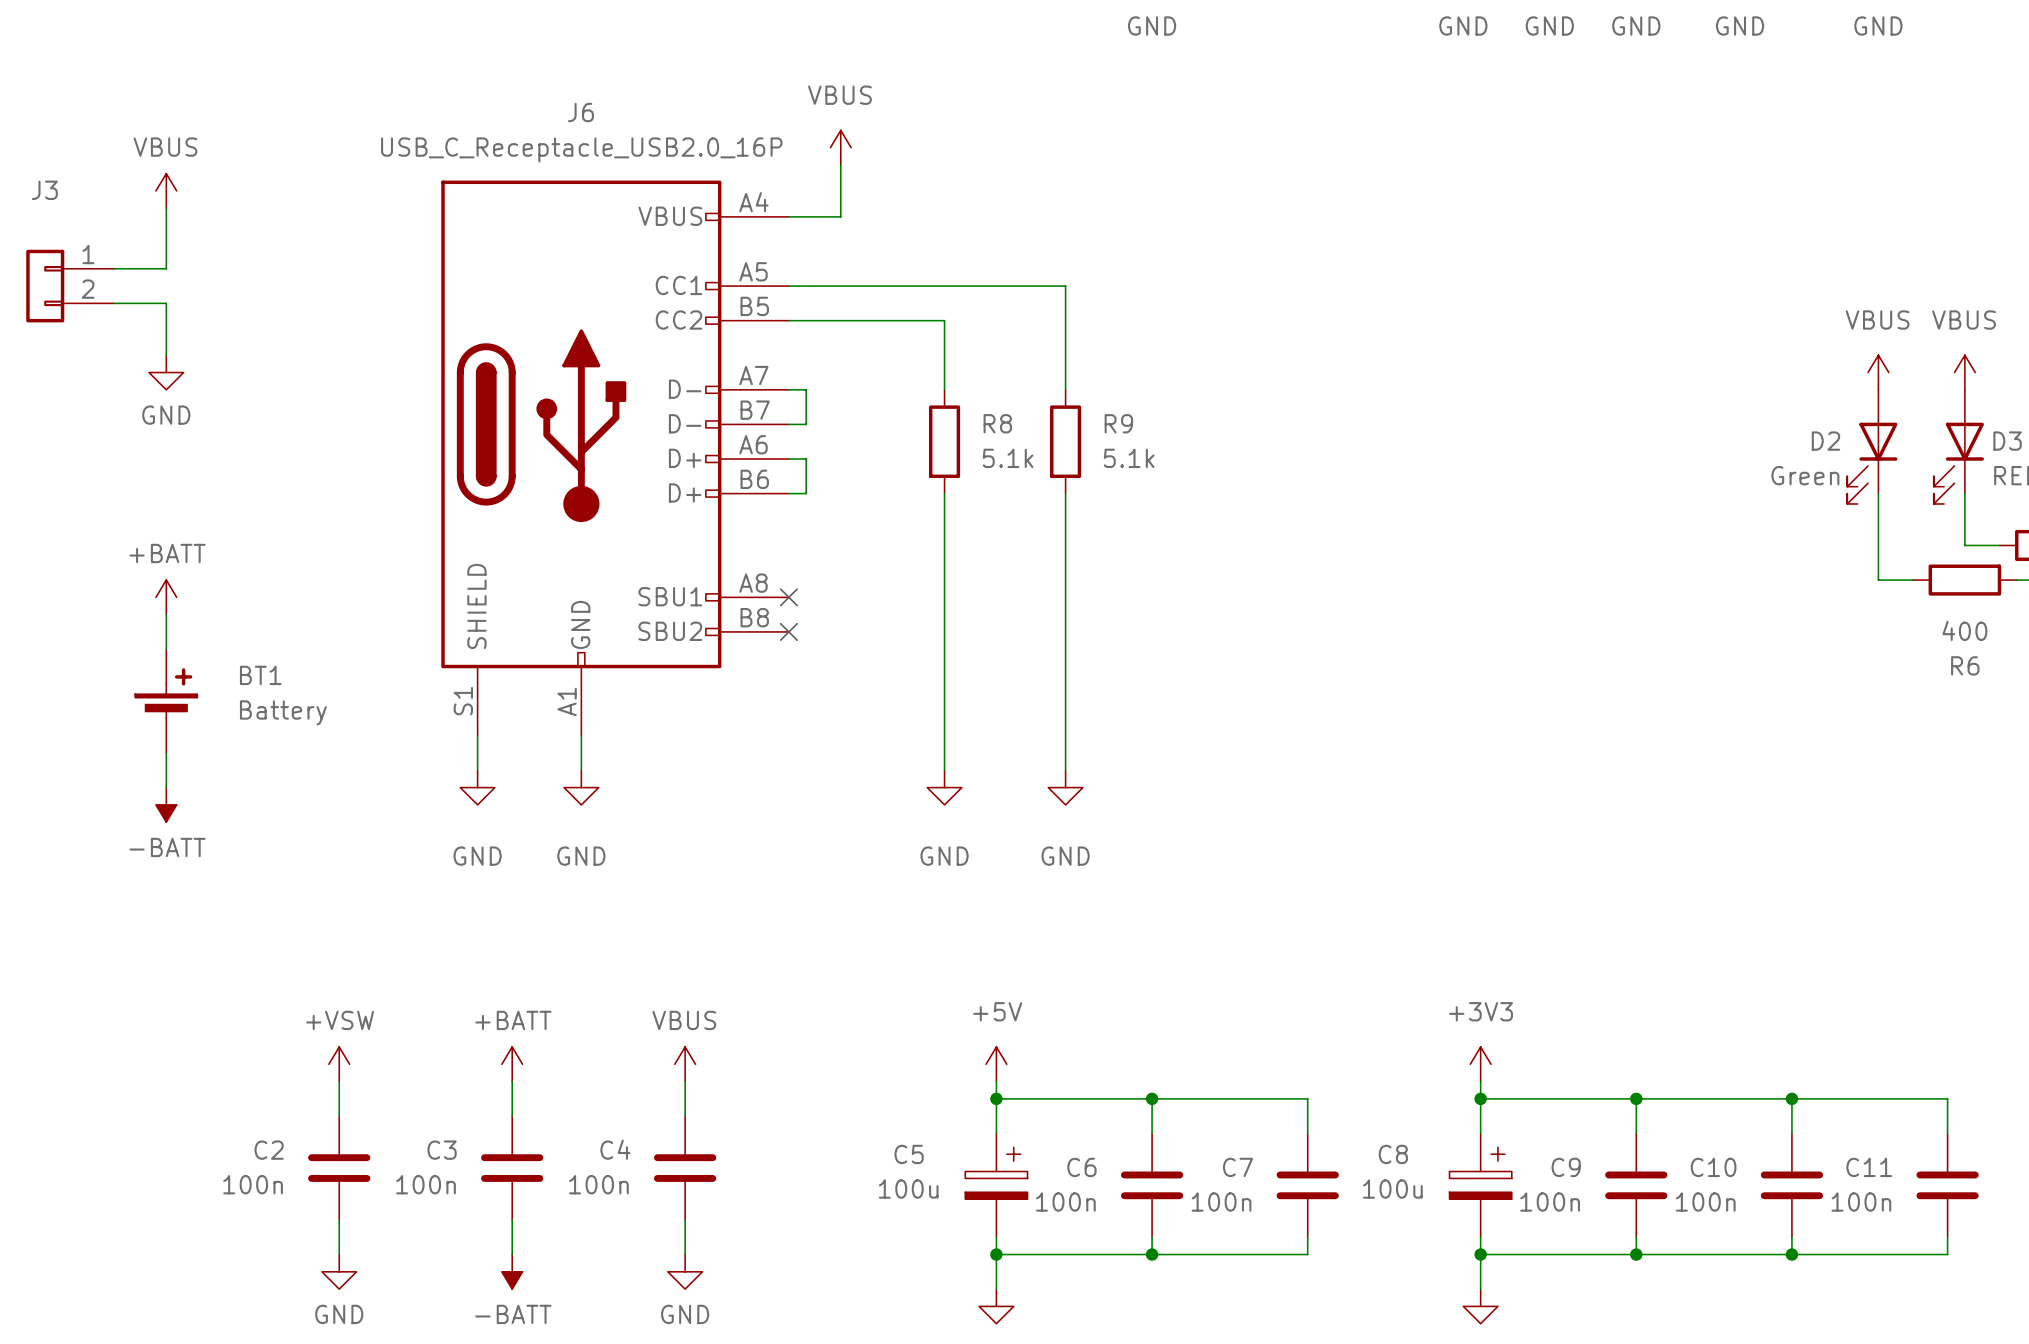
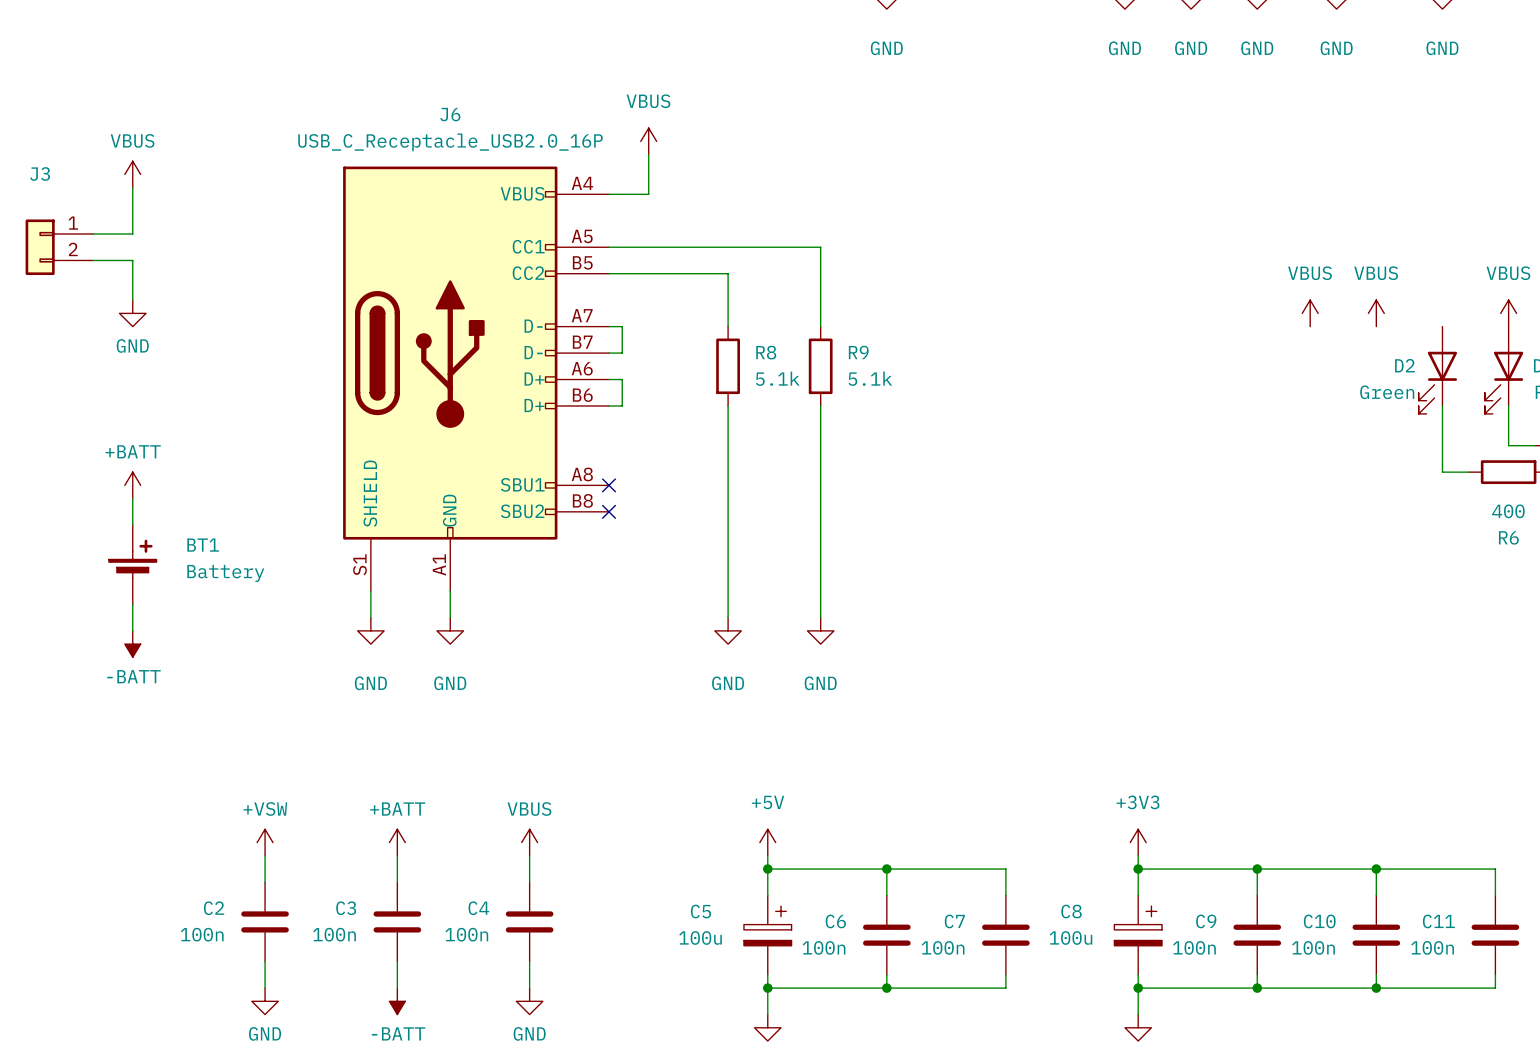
power symbol: none -> VBUS (1310, 313)
power symbol: none -> VBUS (1376, 313)
power symbol: VBUS (1878, 372) -> none

